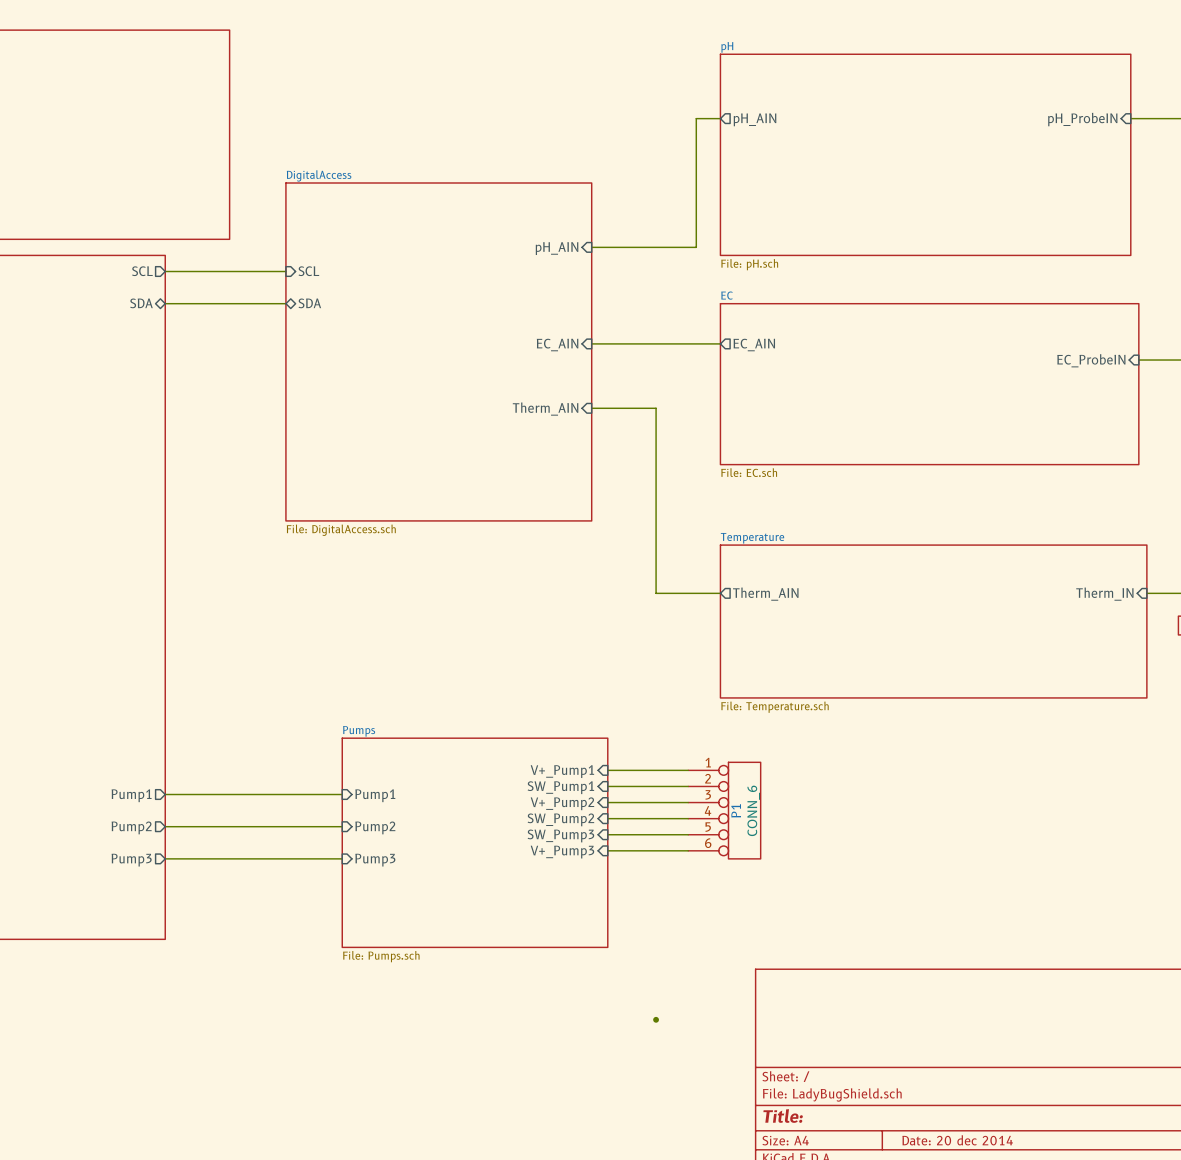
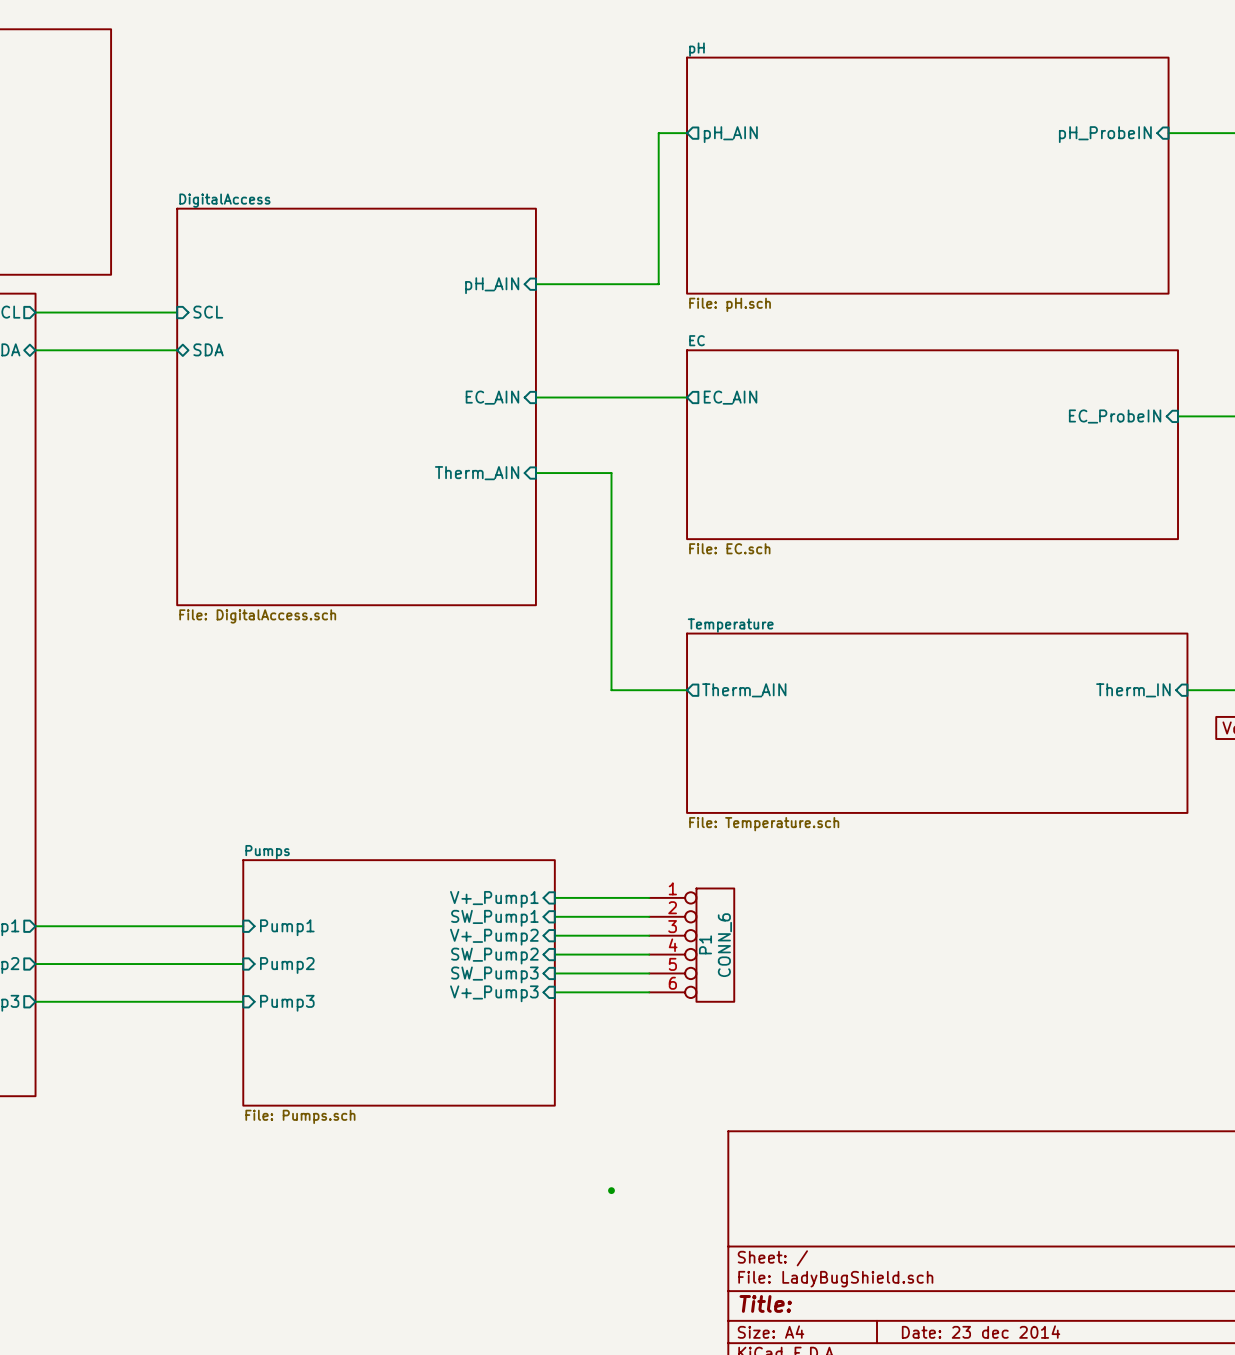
title block: Date: 20 dec 2014 (957, 1140) -> Date: 23 dec 2014 (981, 1332)

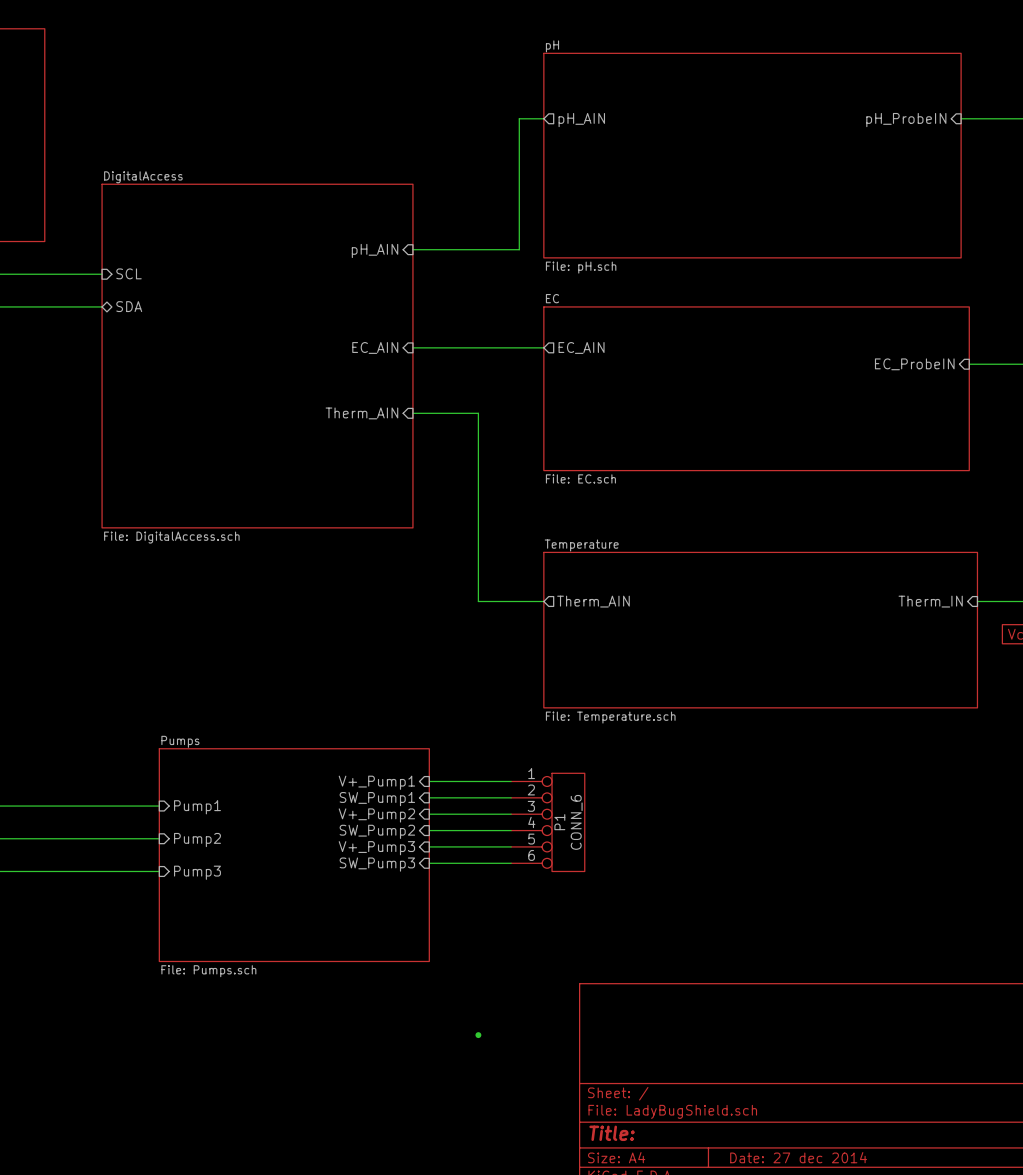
sheet pin: SW_Pump3 (494, 974) -> V+_Pump3 (376, 848)
sheet pin: V+_Pump3 (494, 993) -> SW_Pump3 (377, 864)
title block: Date: 23 dec 2014 (981, 1332) -> Date: 27 dec 2014 (798, 1157)

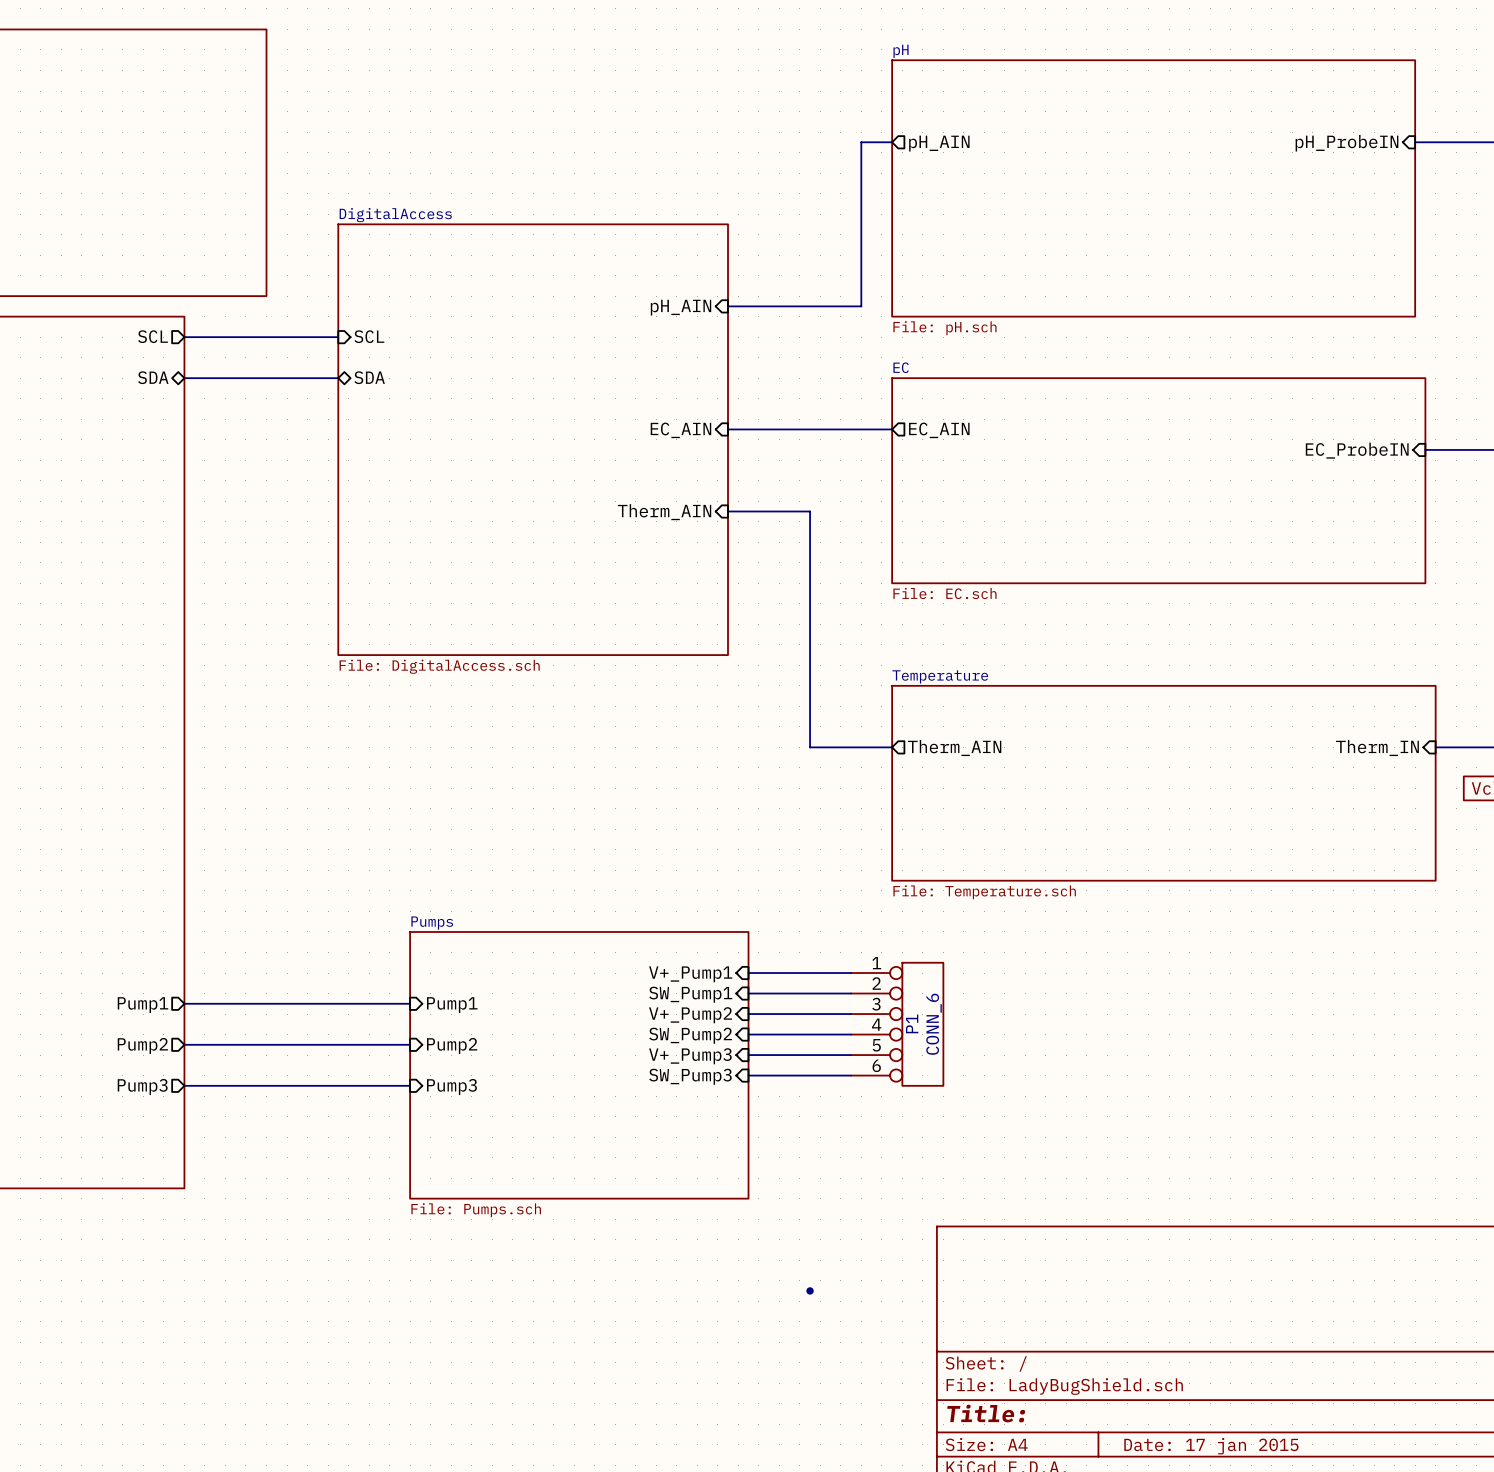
title block: Date: 27 dec 2014 (798, 1157) -> Date: 17 jan 2015 (1211, 1446)

